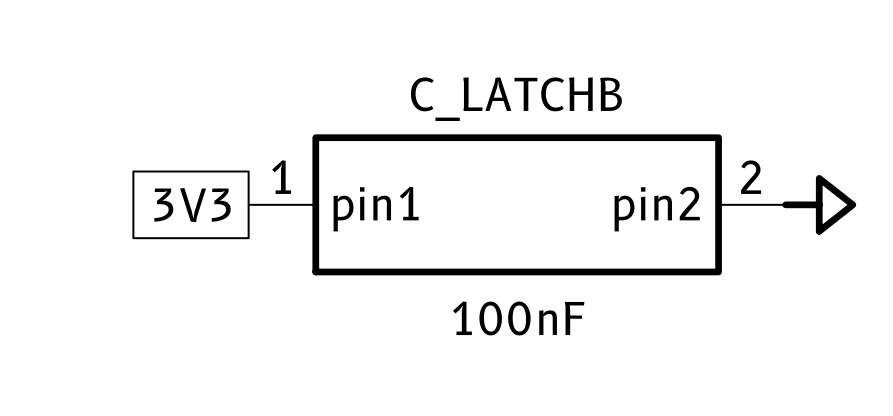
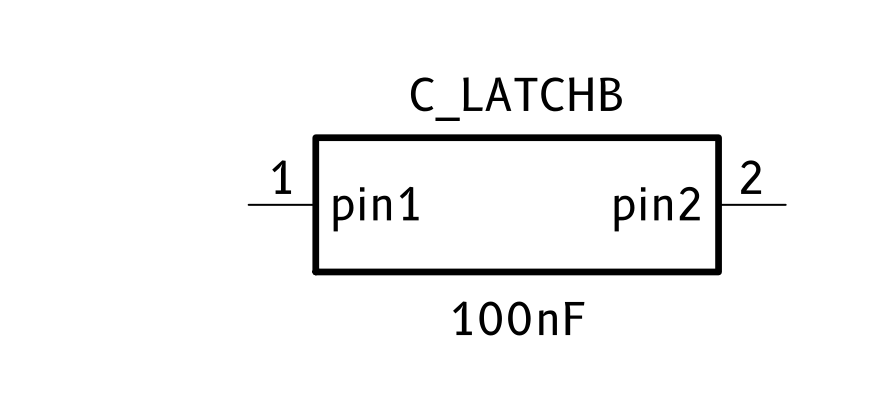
power symbol: (819, 204) -> none
global label: 3V3 (192, 205) -> none

